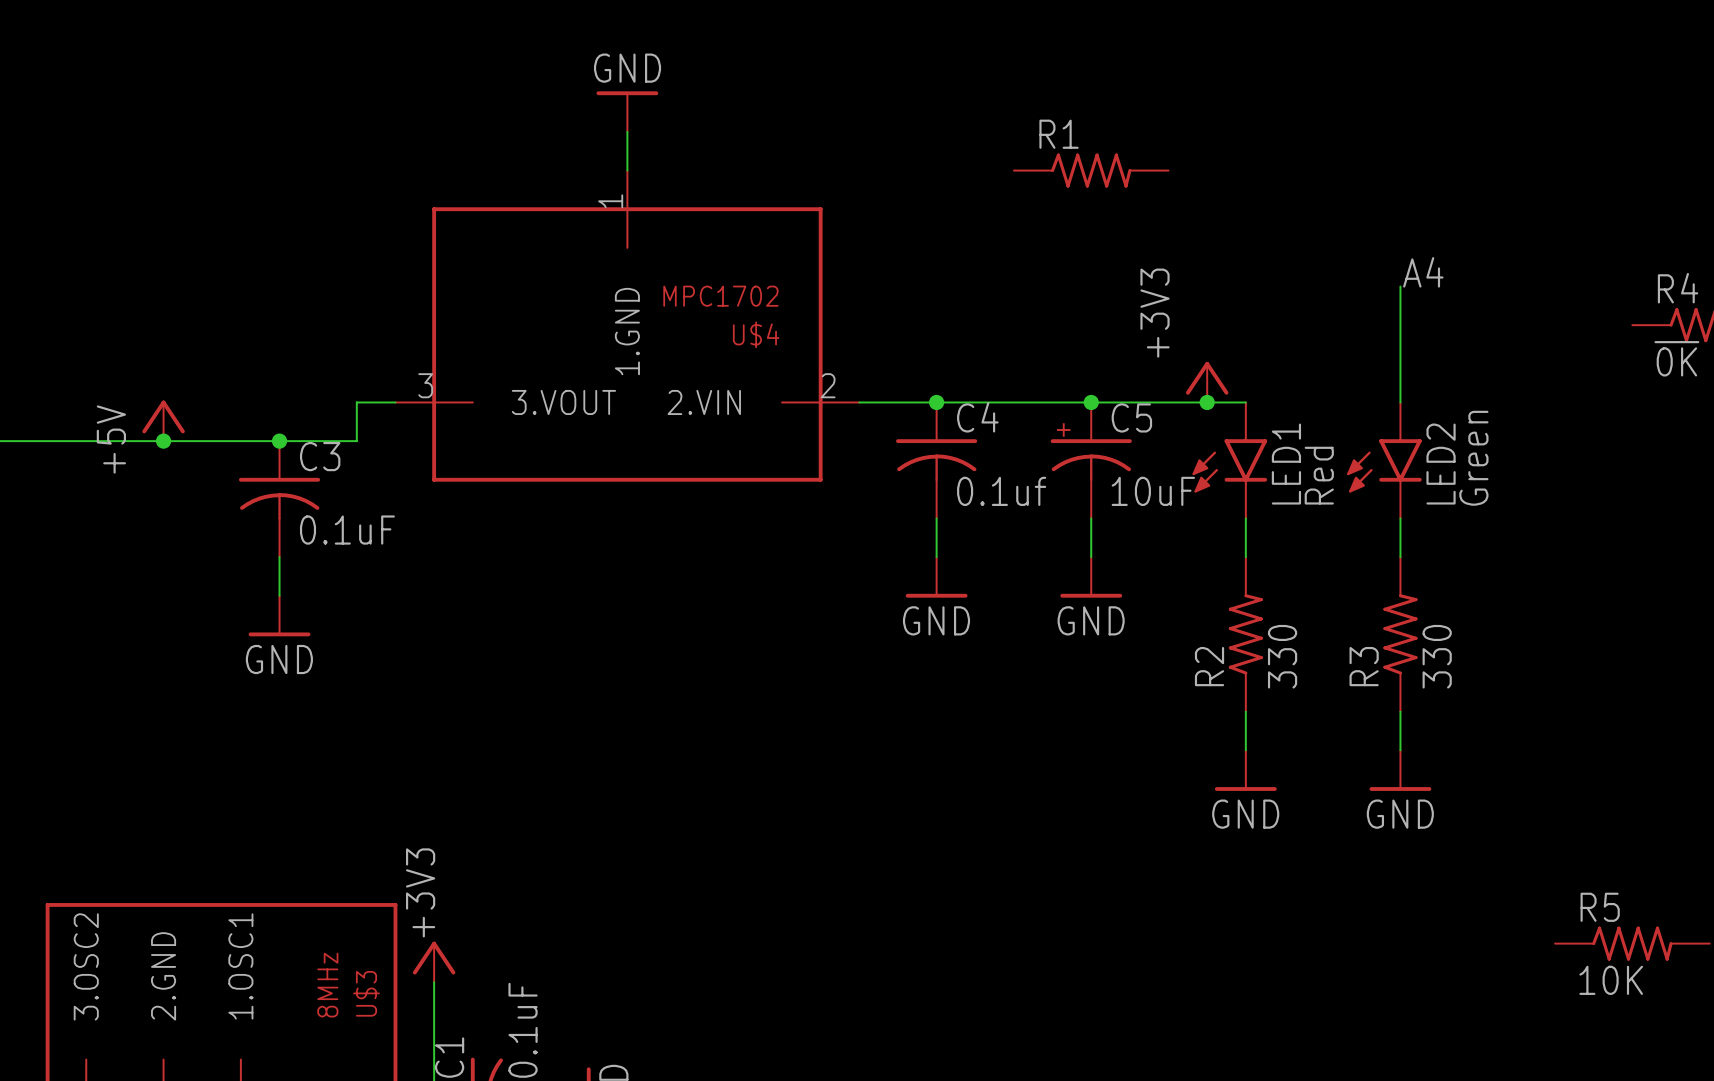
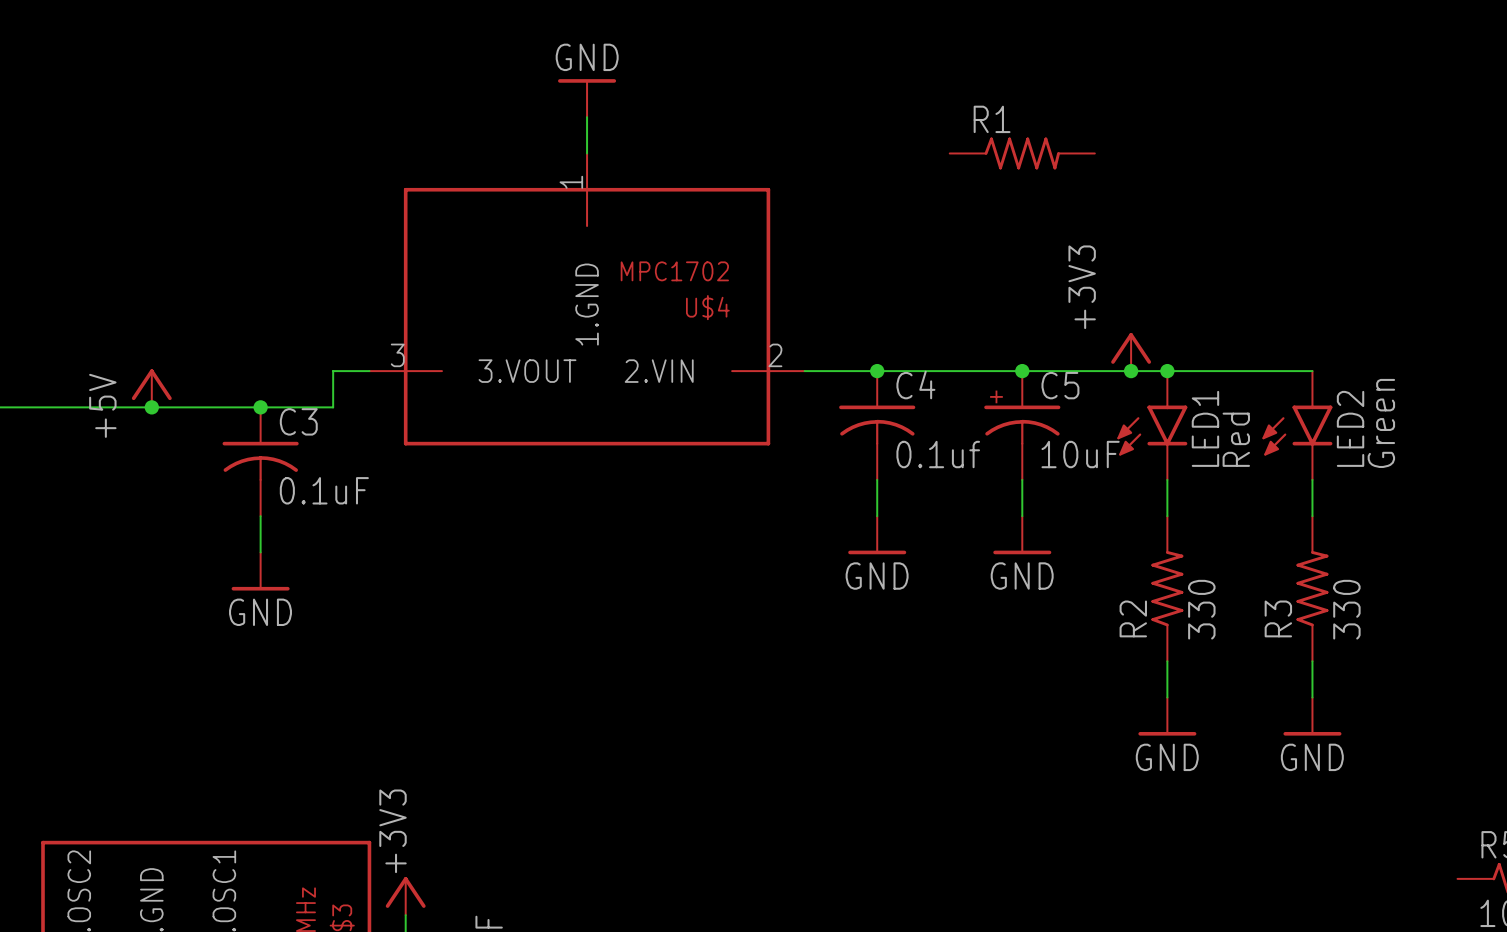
label: A4 (1423, 272) -> none
wire: (1400, 286) (1400, 402) -> (1167, 371) (1312, 371)
junction: none -> (1167, 371)

